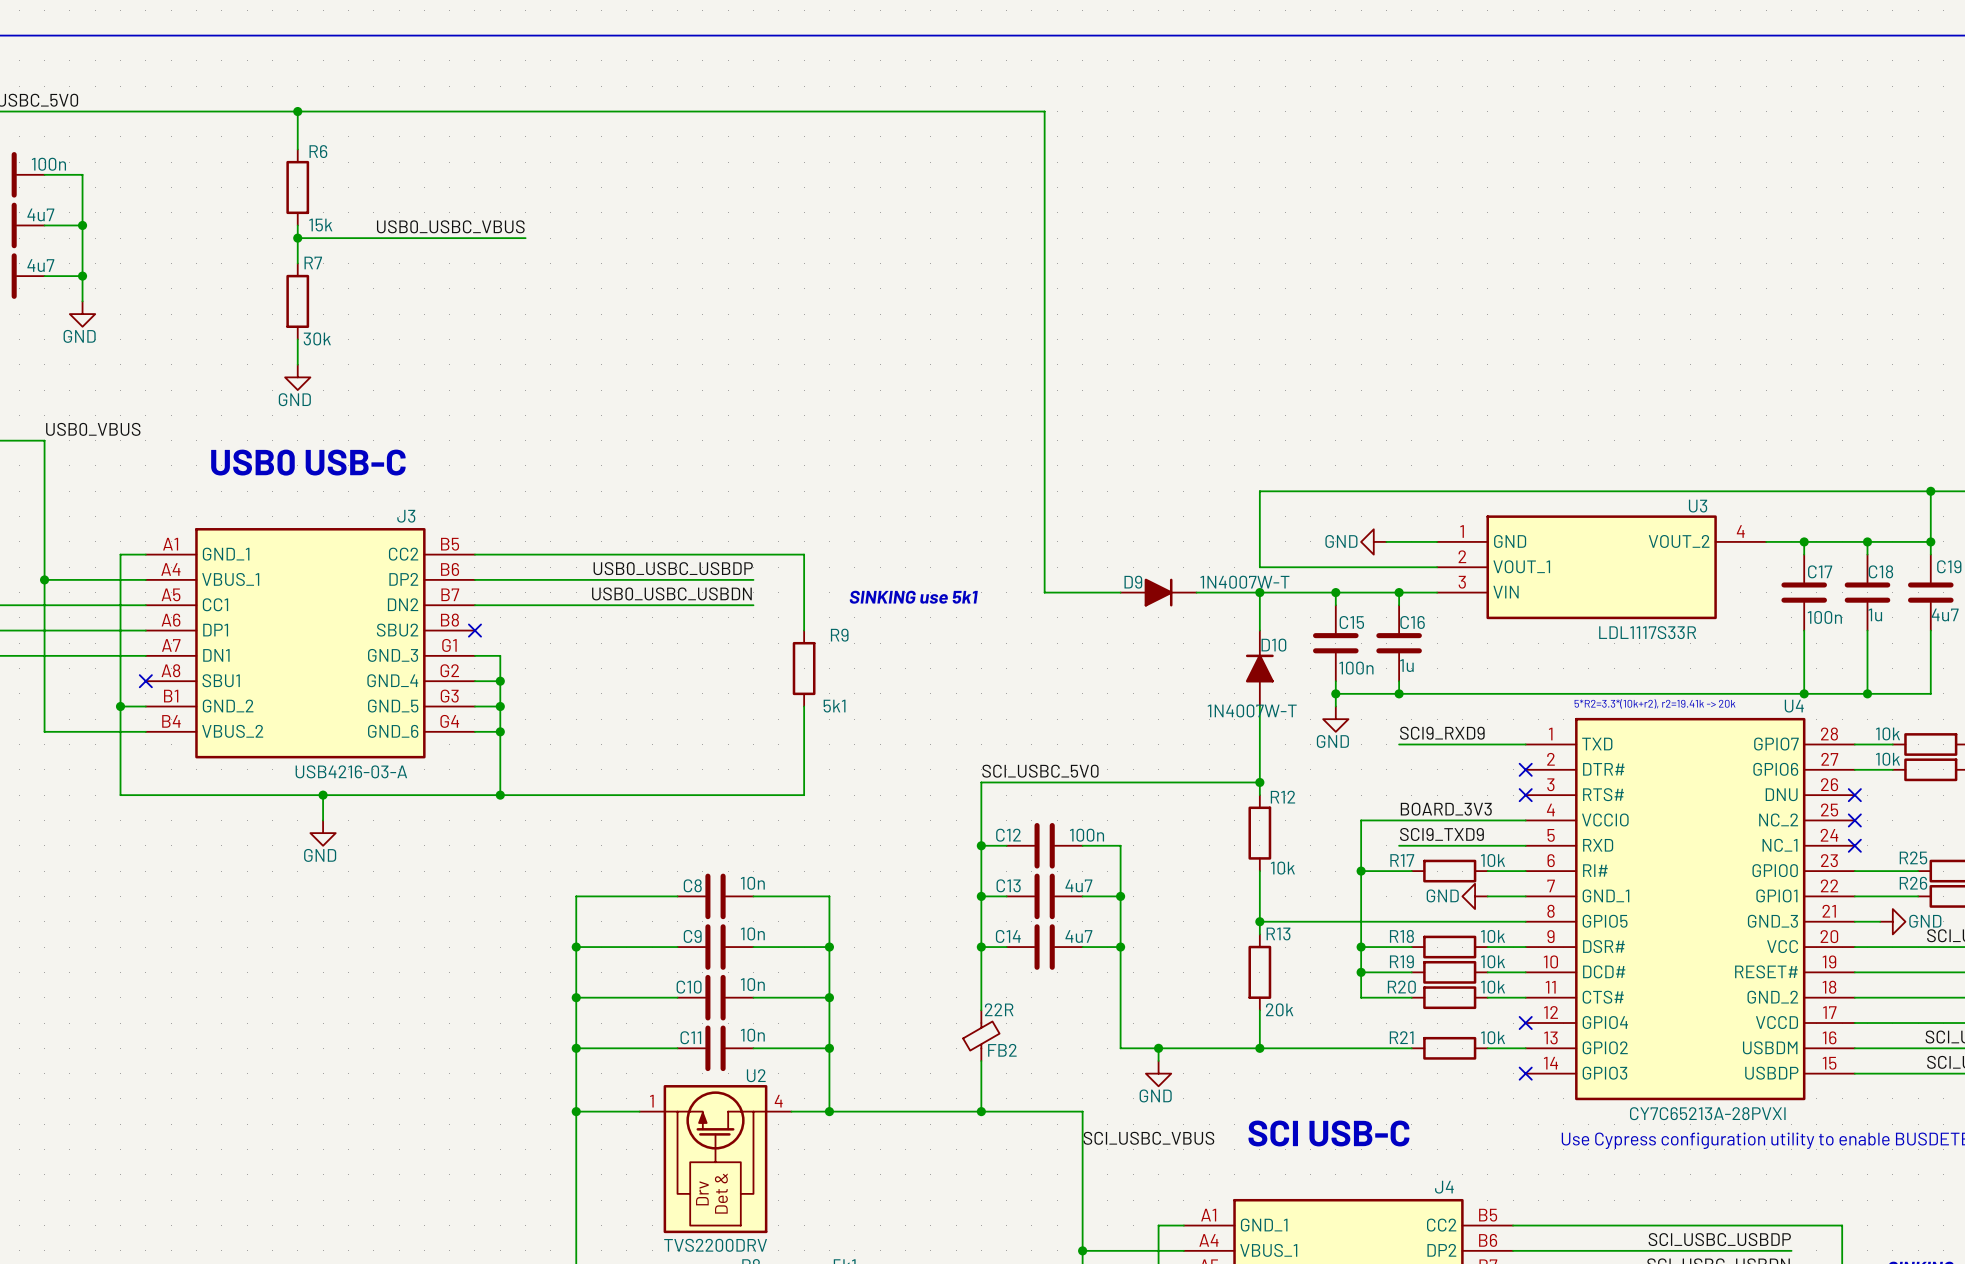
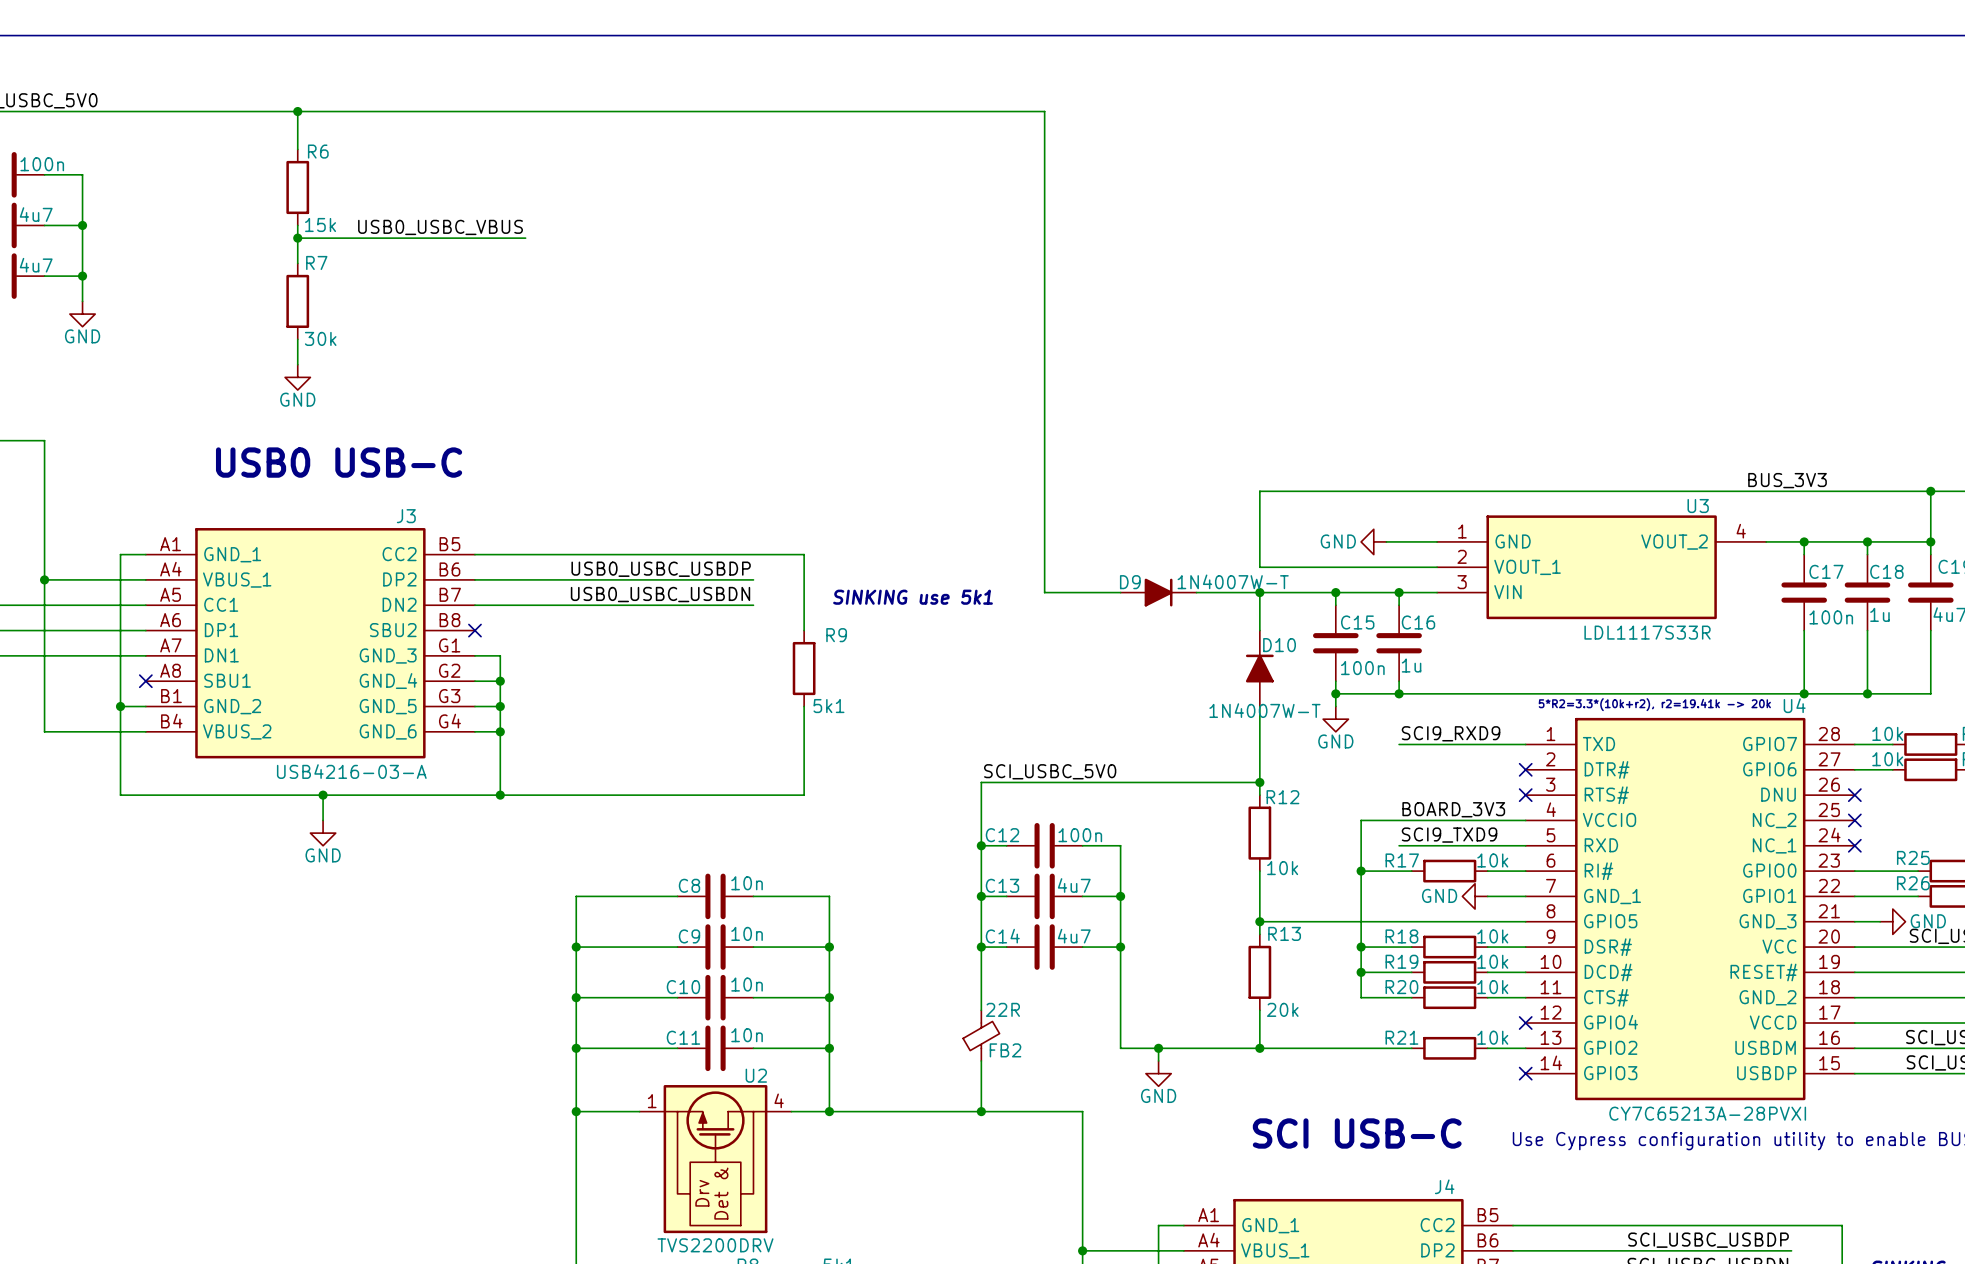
label: USB0_VBUS (93, 429) -> none
label: none -> BUS_3V3 (1787, 480)
label: SCI_USBC_VBUS (1148, 1138) -> none

